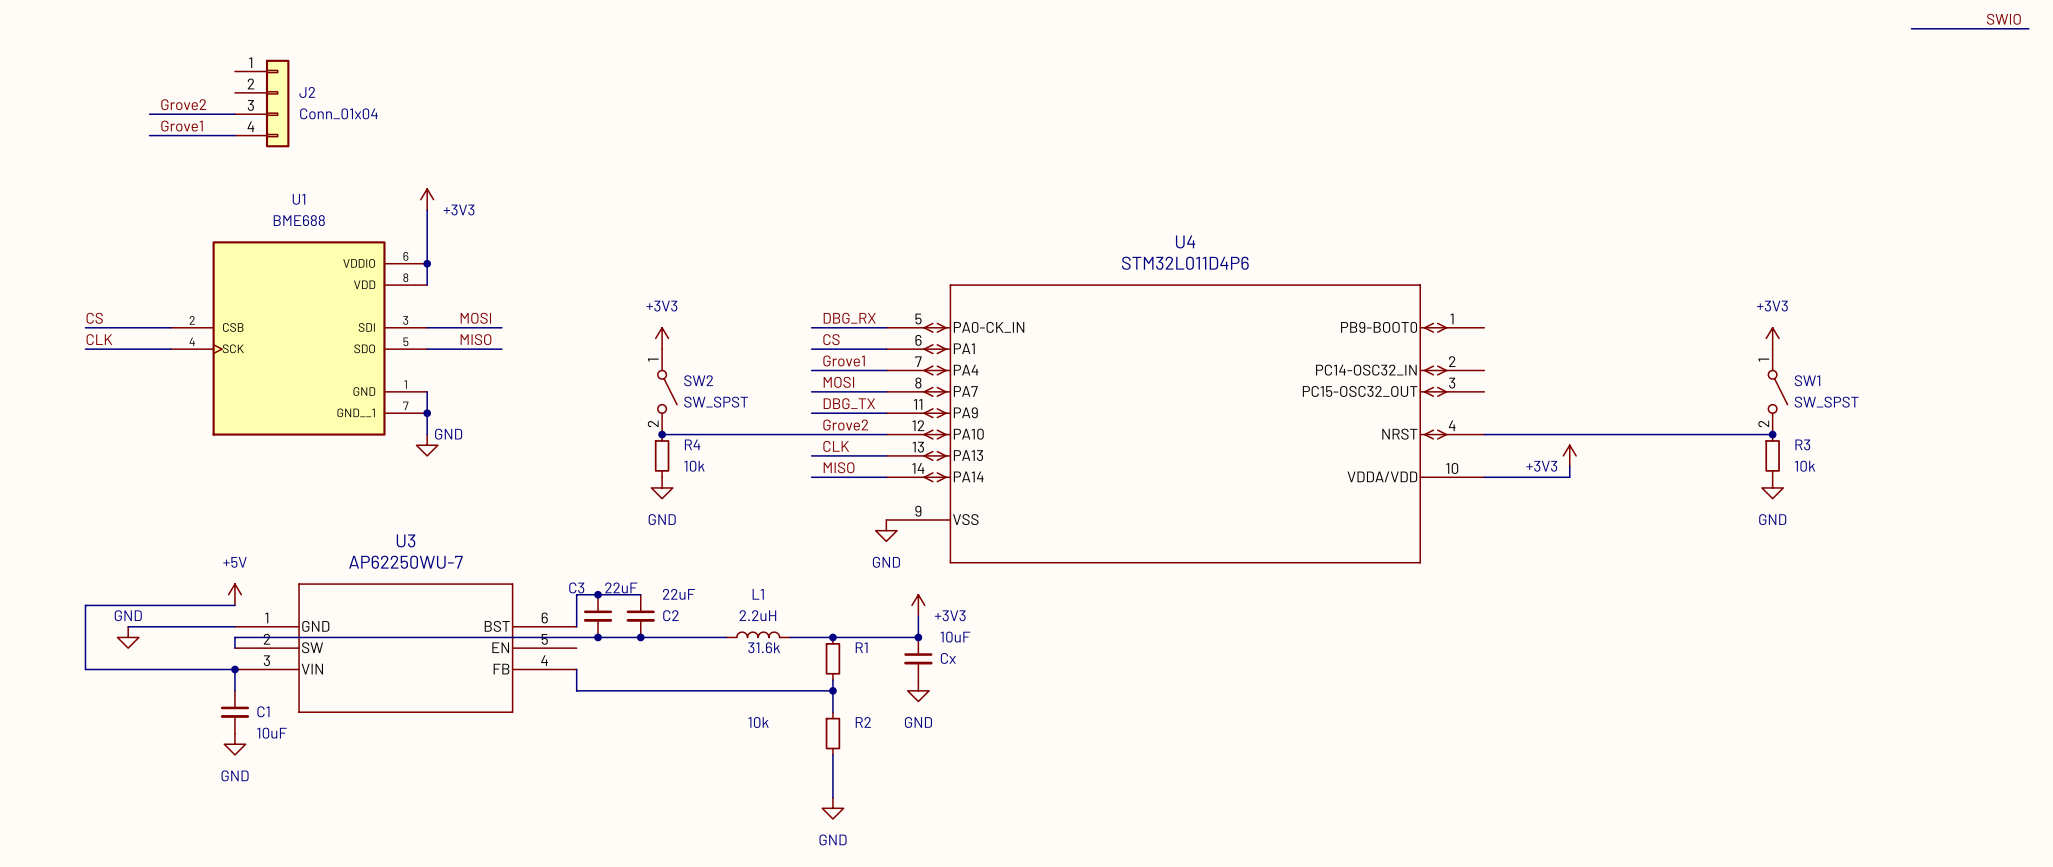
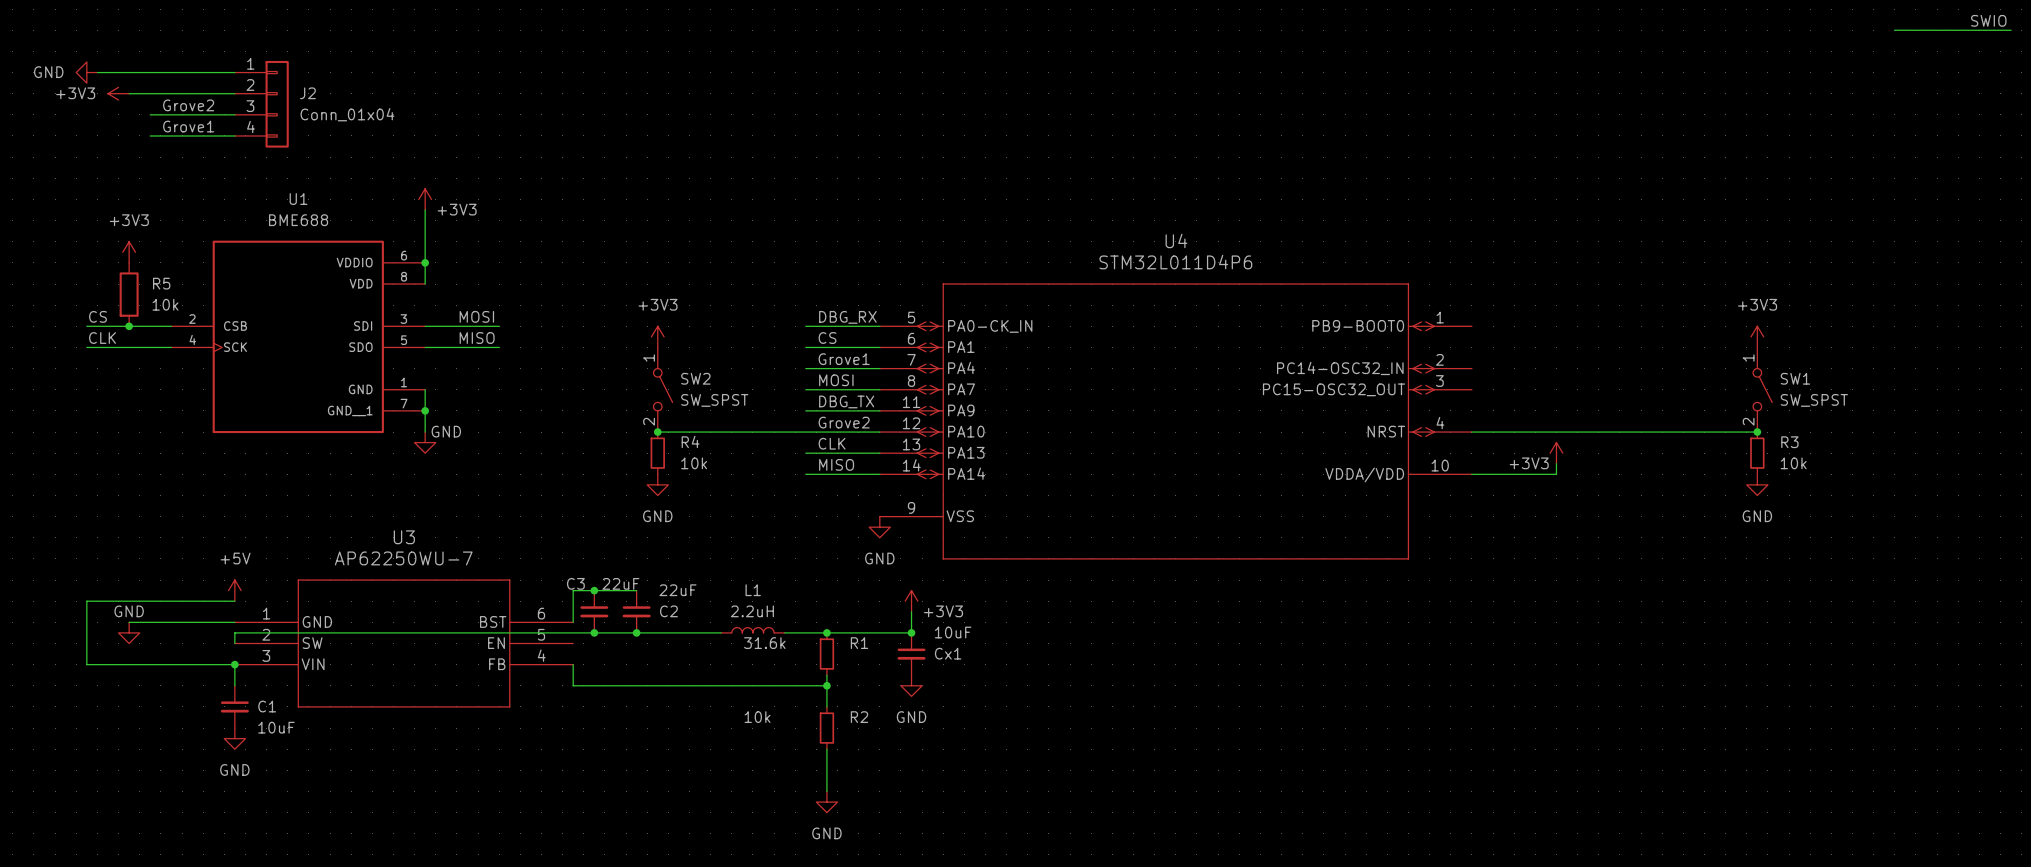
power symbol: none -> GND (86, 72)
wire: none -> (97, 72) (234, 72)
power symbol: none -> +3V3 (118, 93)
wire: none -> (129, 93) (234, 93)
power symbol: none -> +3V3 (129, 252)
R5: none -> 10k (129, 294)
junction: none -> (129, 326)
Cx name: Cx (948, 658) -> Cx1 (948, 653)

